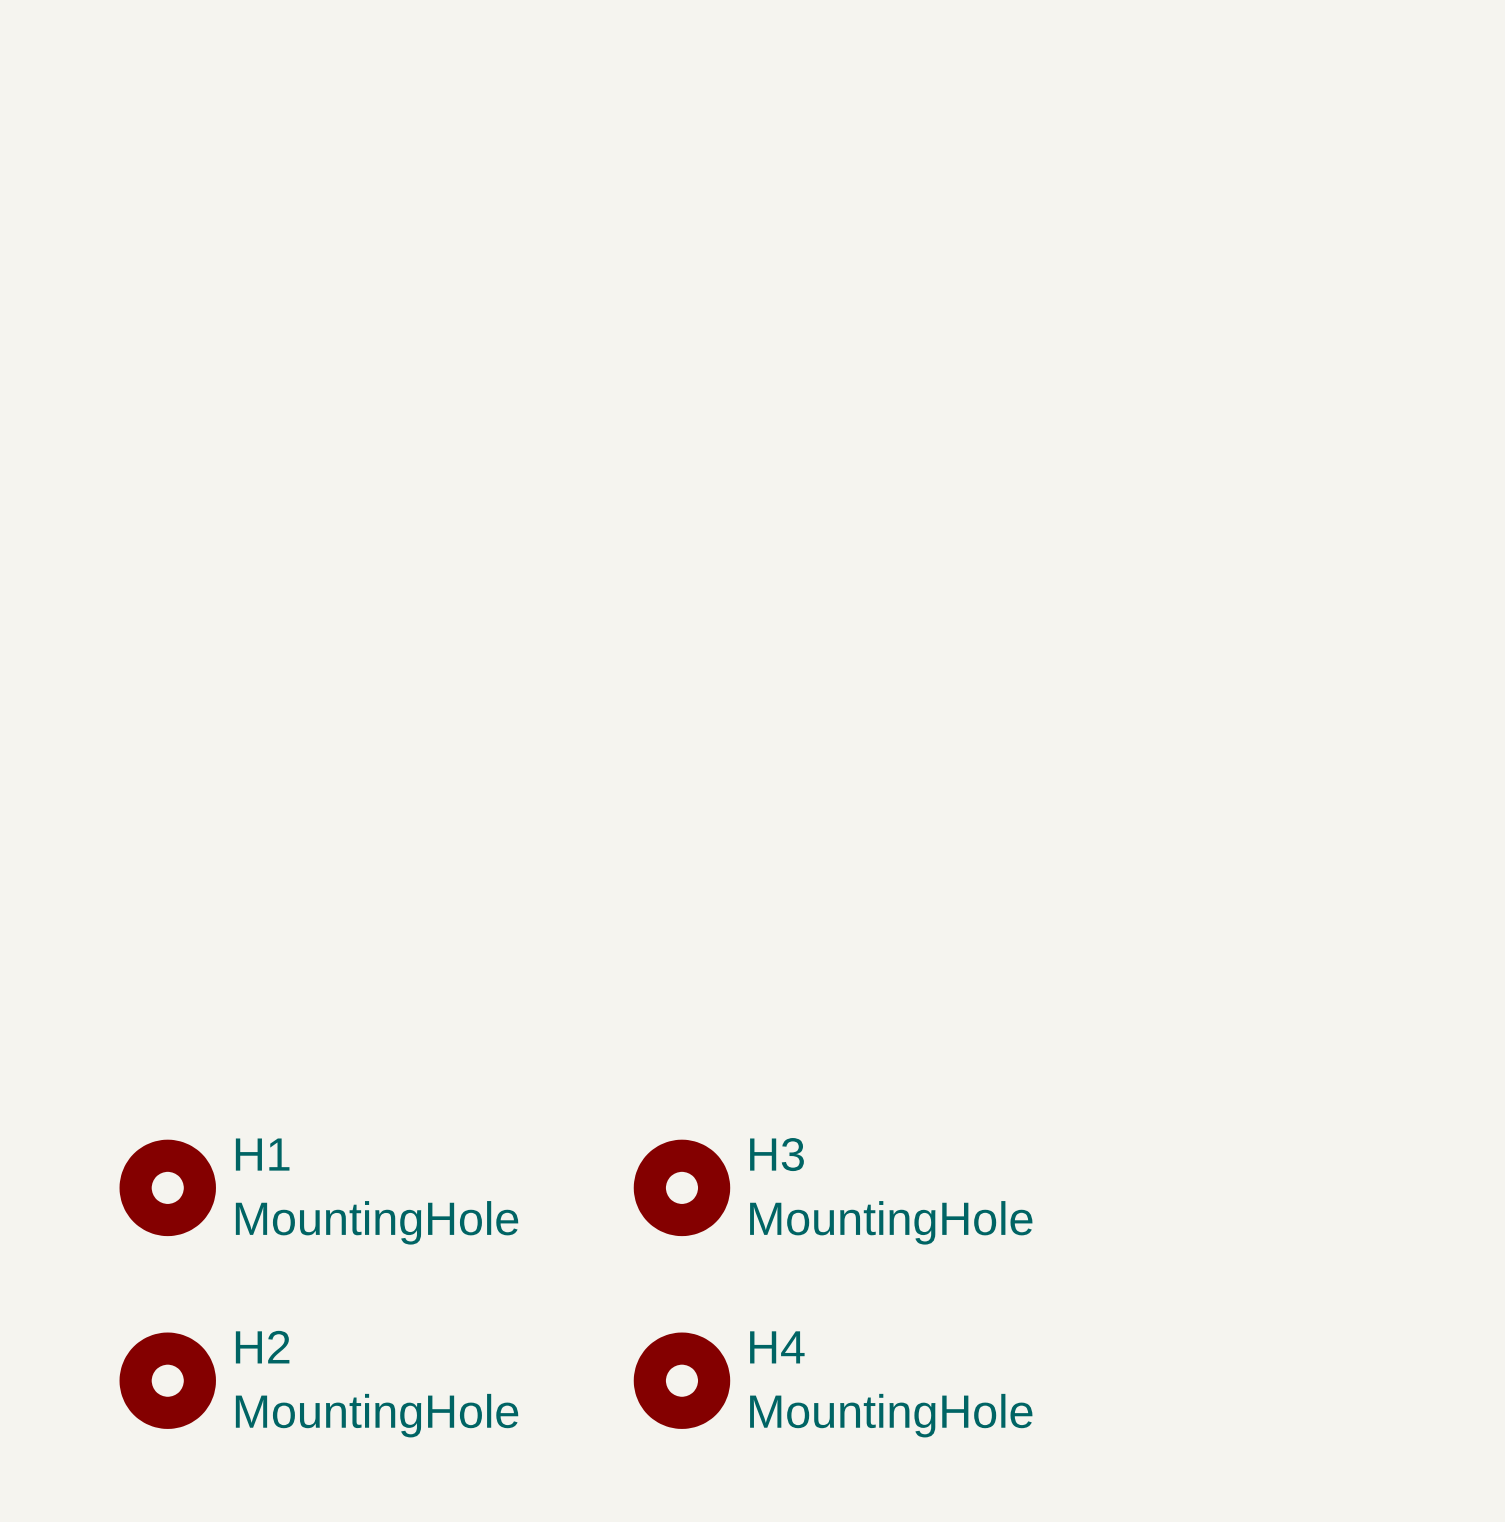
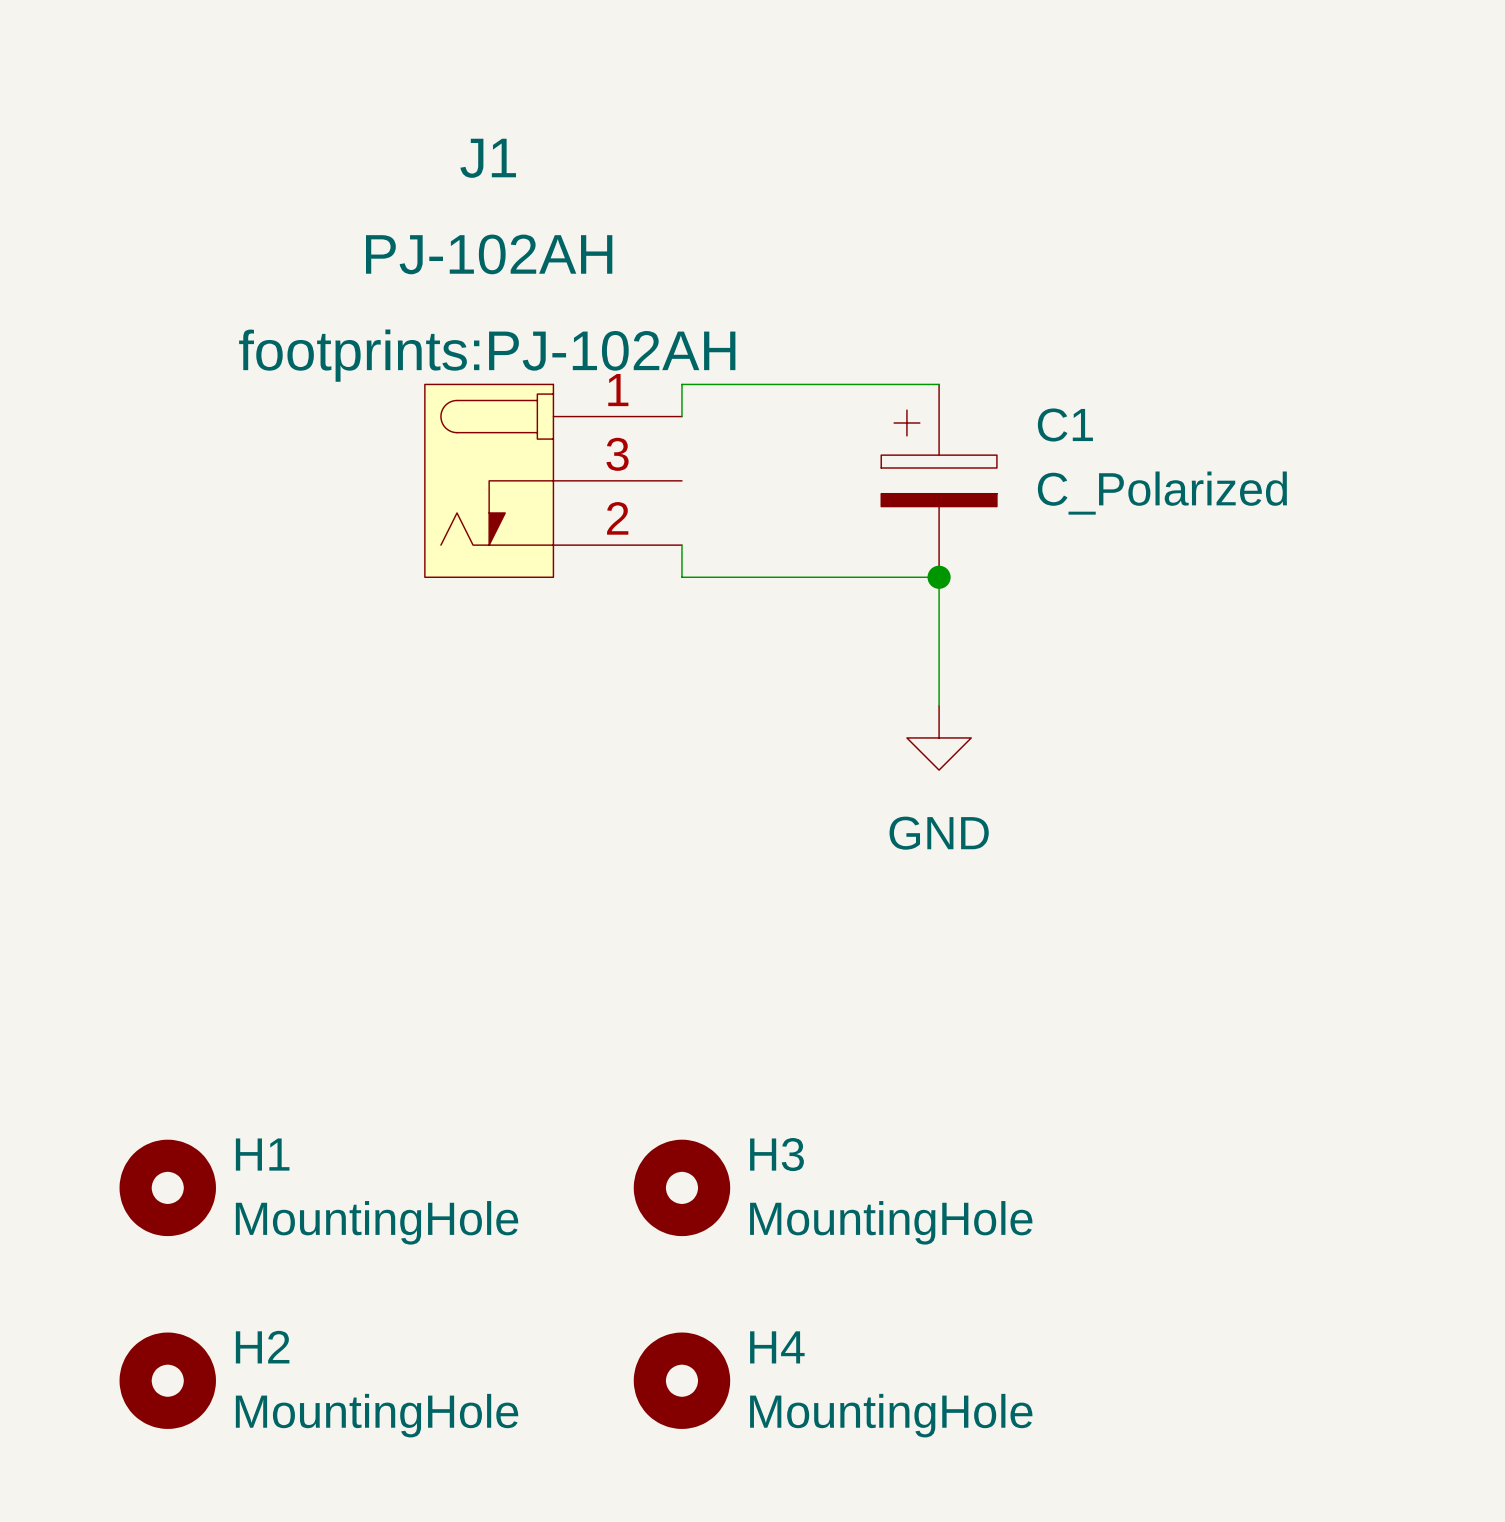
wire: none -> (939, 384) (681, 384) (681, 416)
J1: none -> PJ-102AH (553, 480)
C1: none -> C_Polarized (939, 480)
wire: none -> (681, 545) (681, 577) (939, 577) (939, 705)
junction: none -> (939, 577)
power symbol: none -> GND (939, 737)

